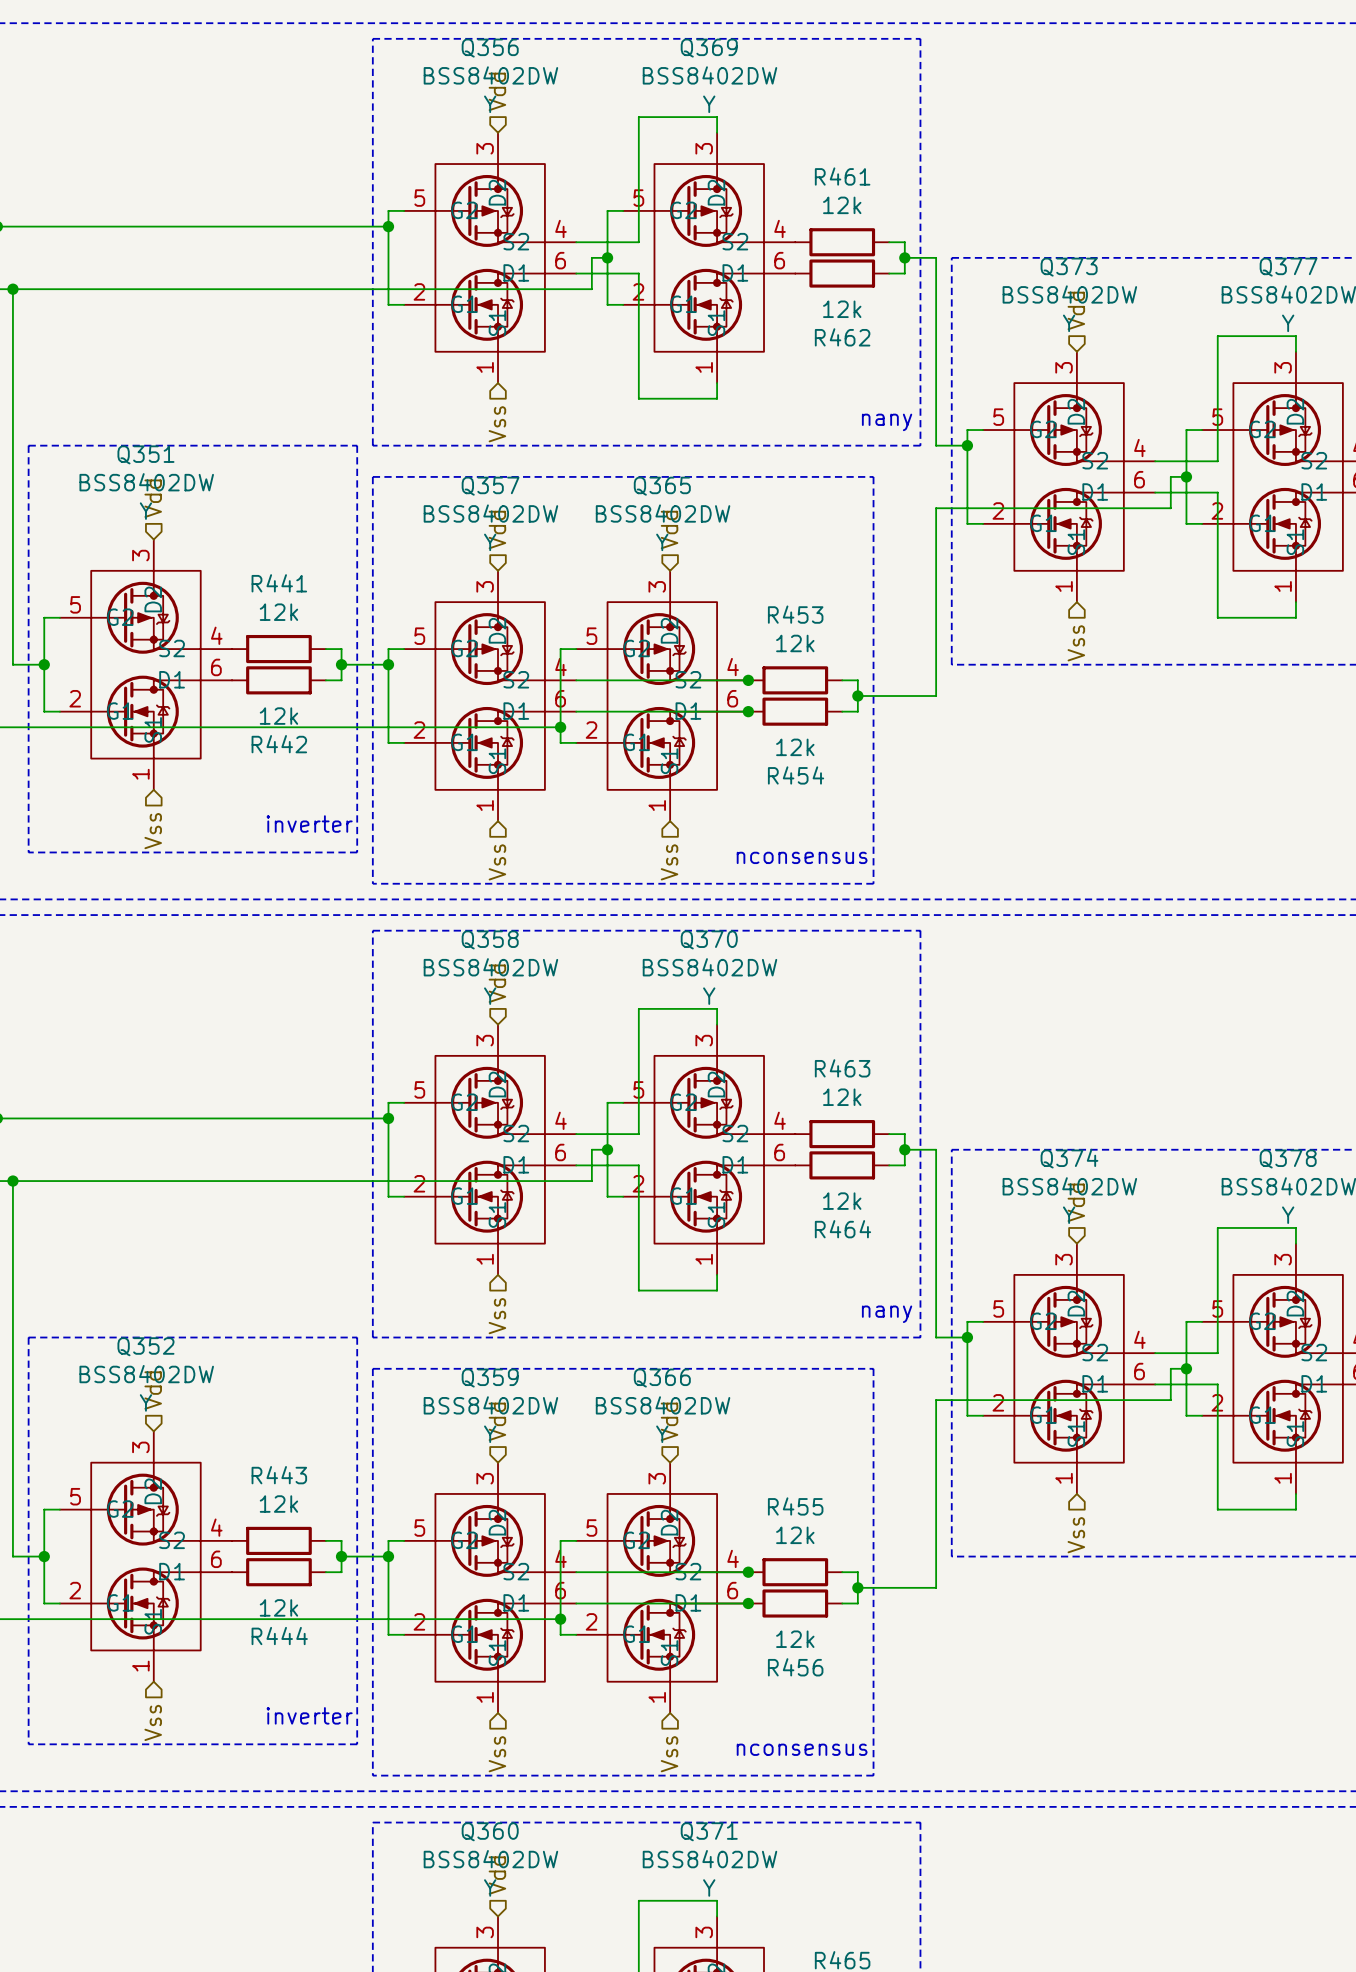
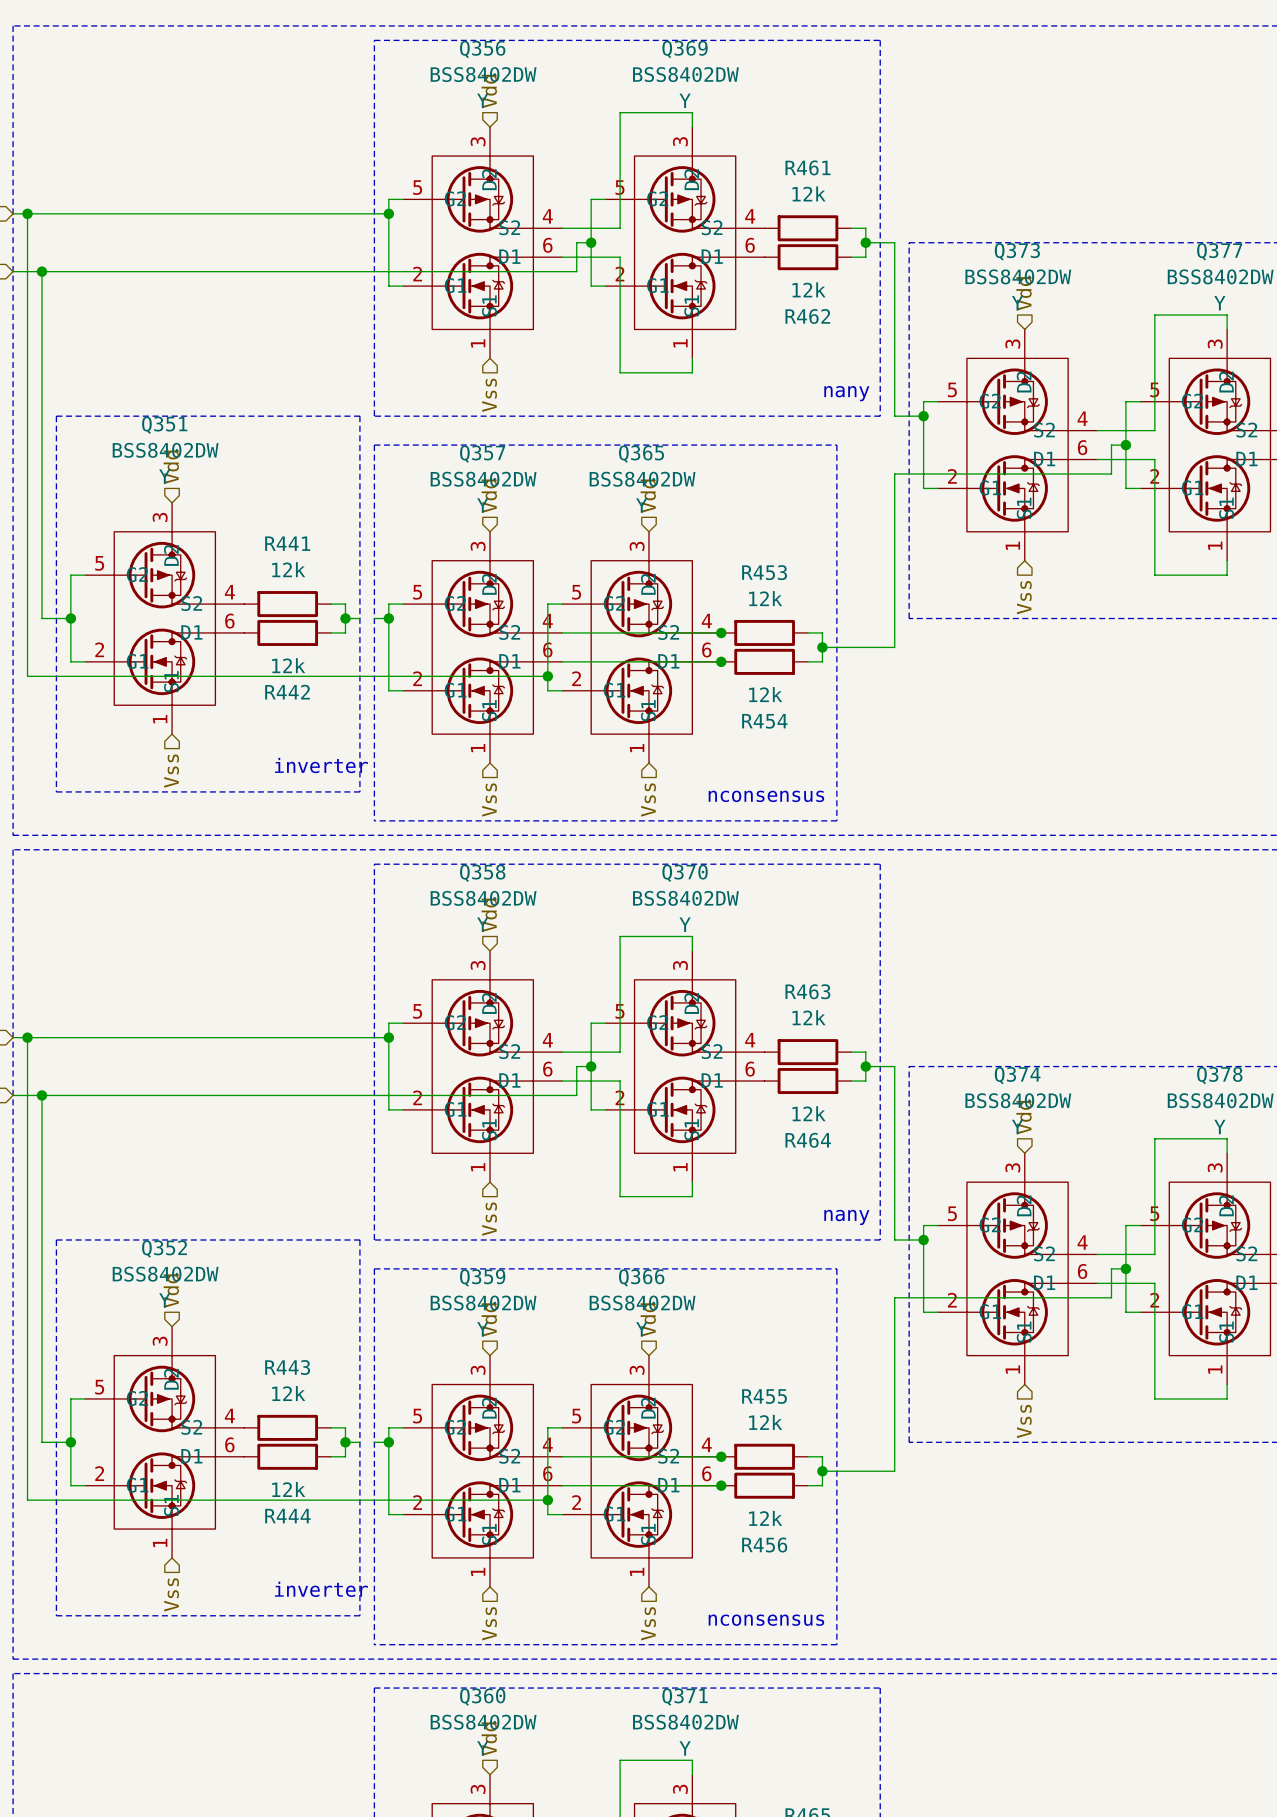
wire: (357, 664) (372, 664) -> none
wire: (357, 1556) (372, 1556) -> none

